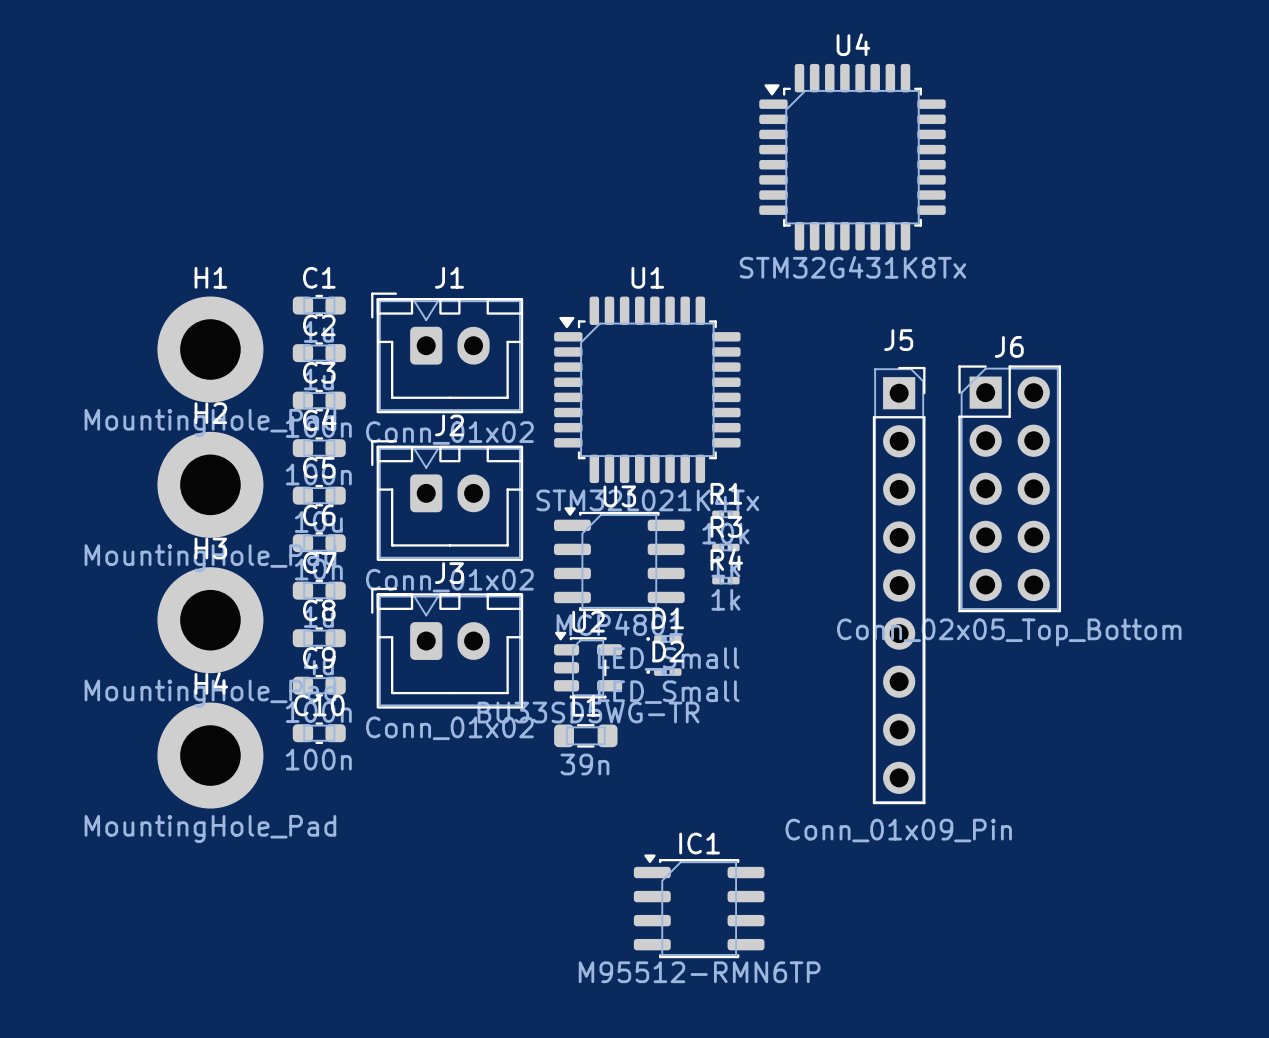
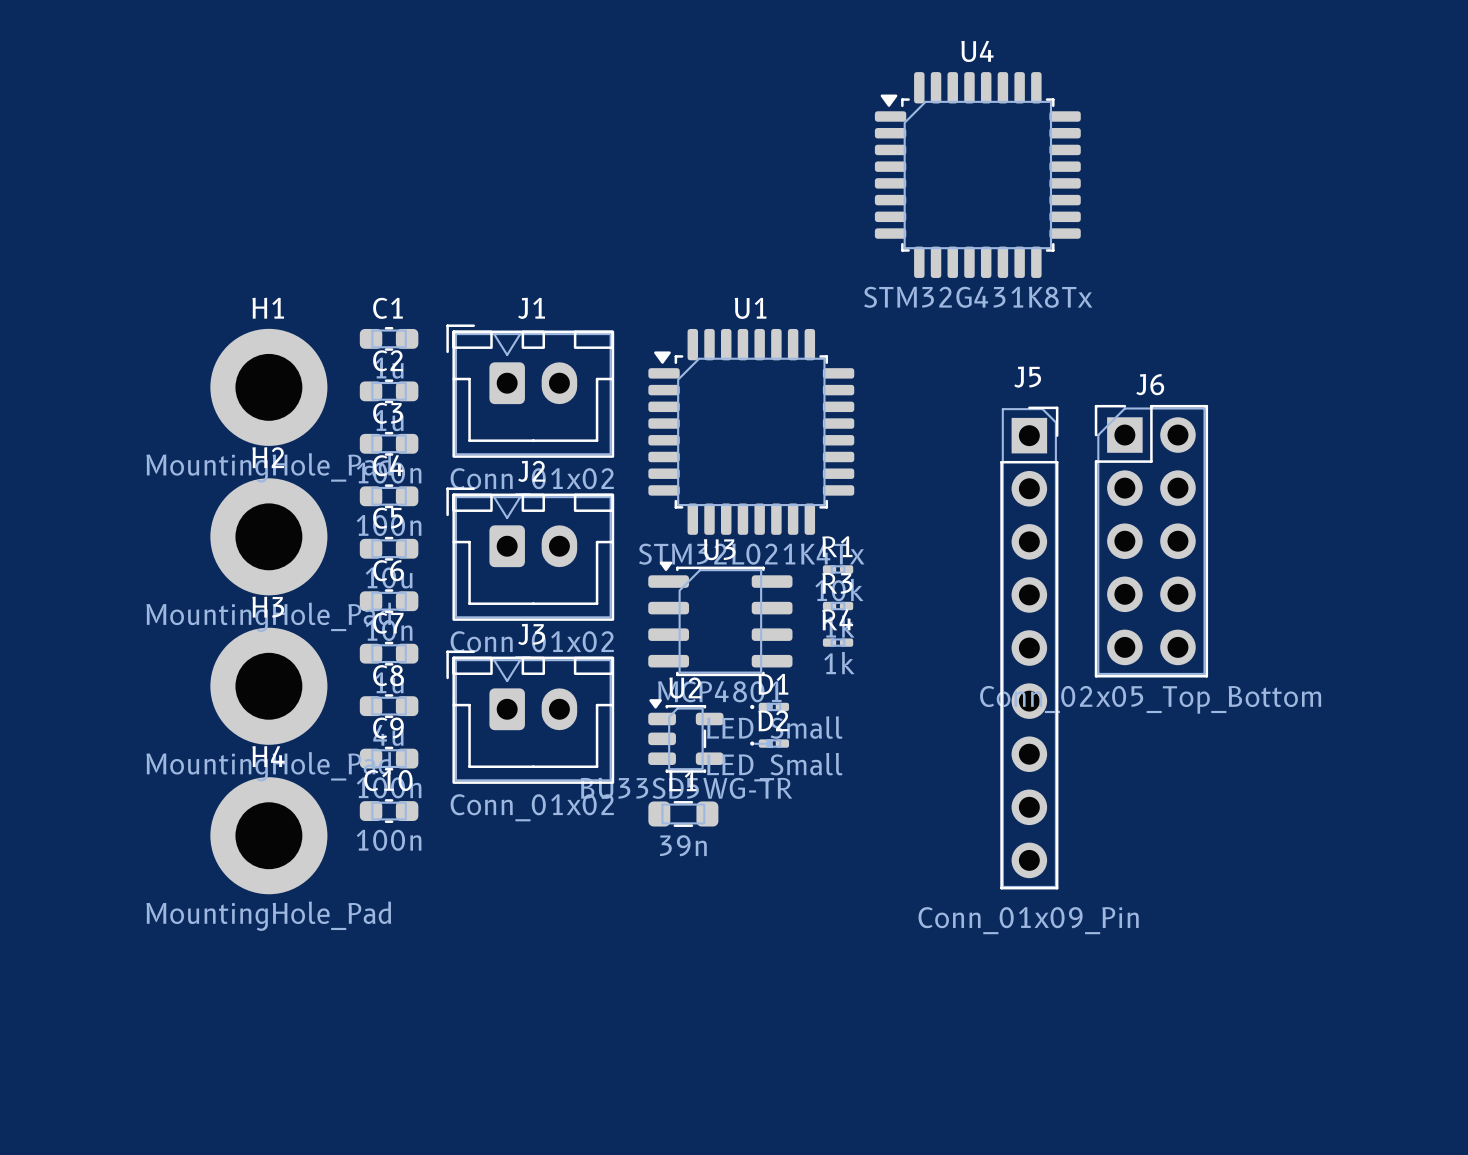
IC1: M95512-RMN6TP (699, 906) -> none

